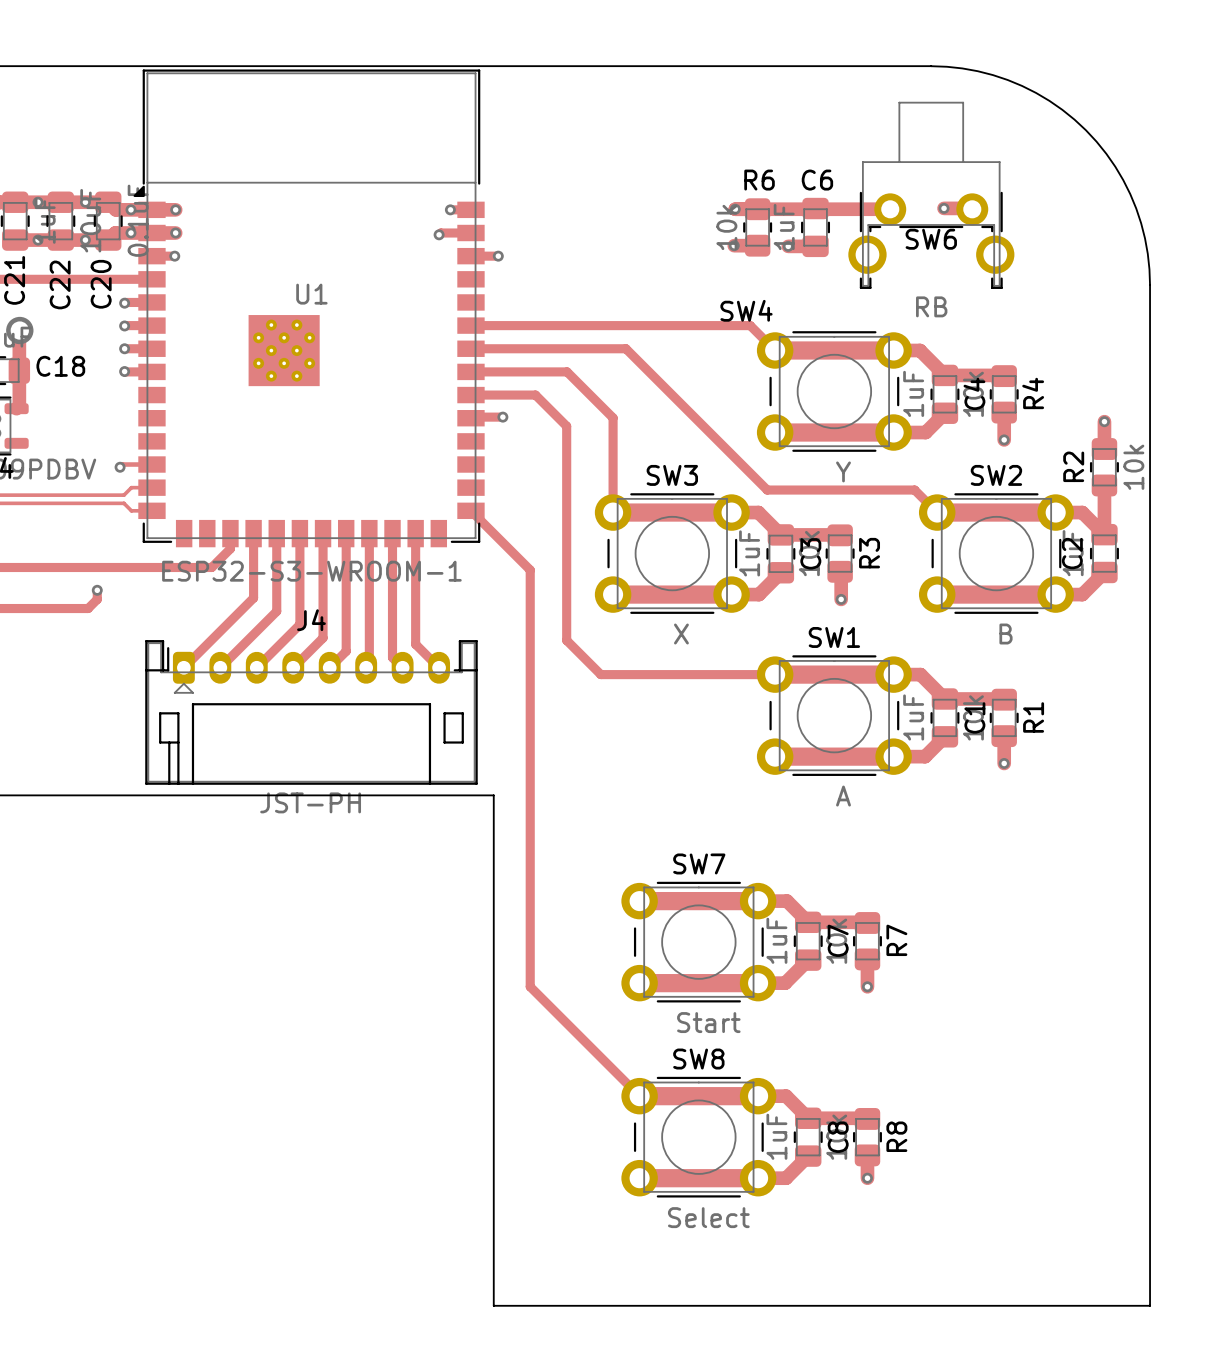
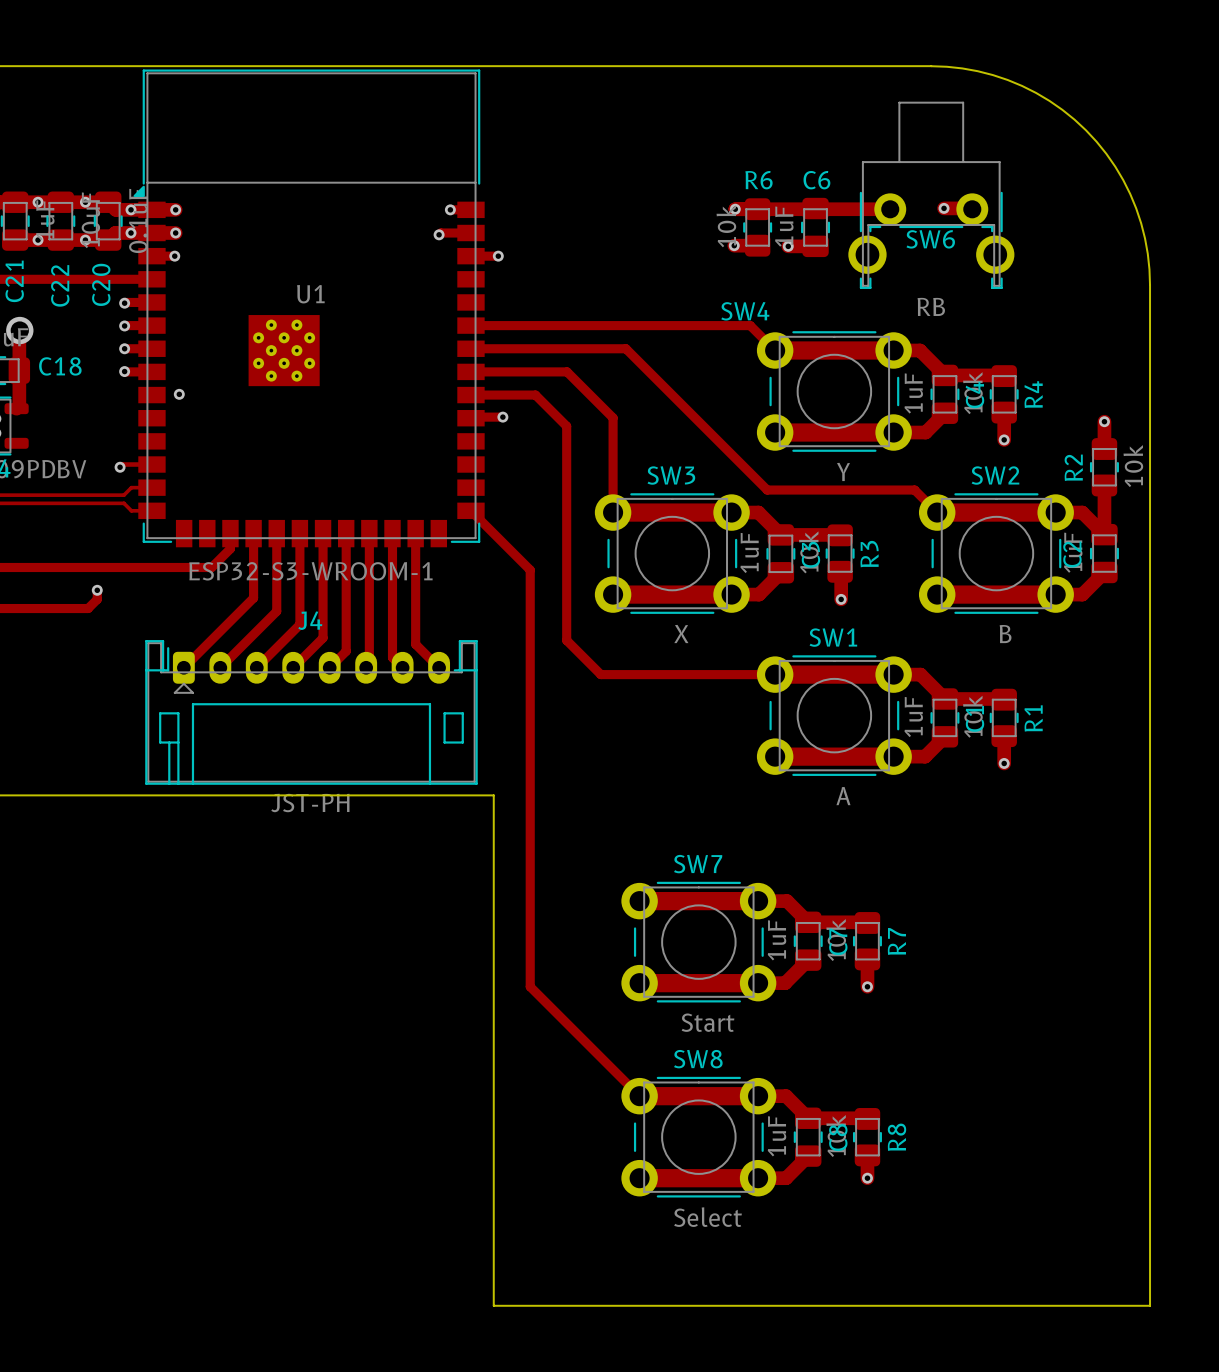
via: none -> (179, 394)

